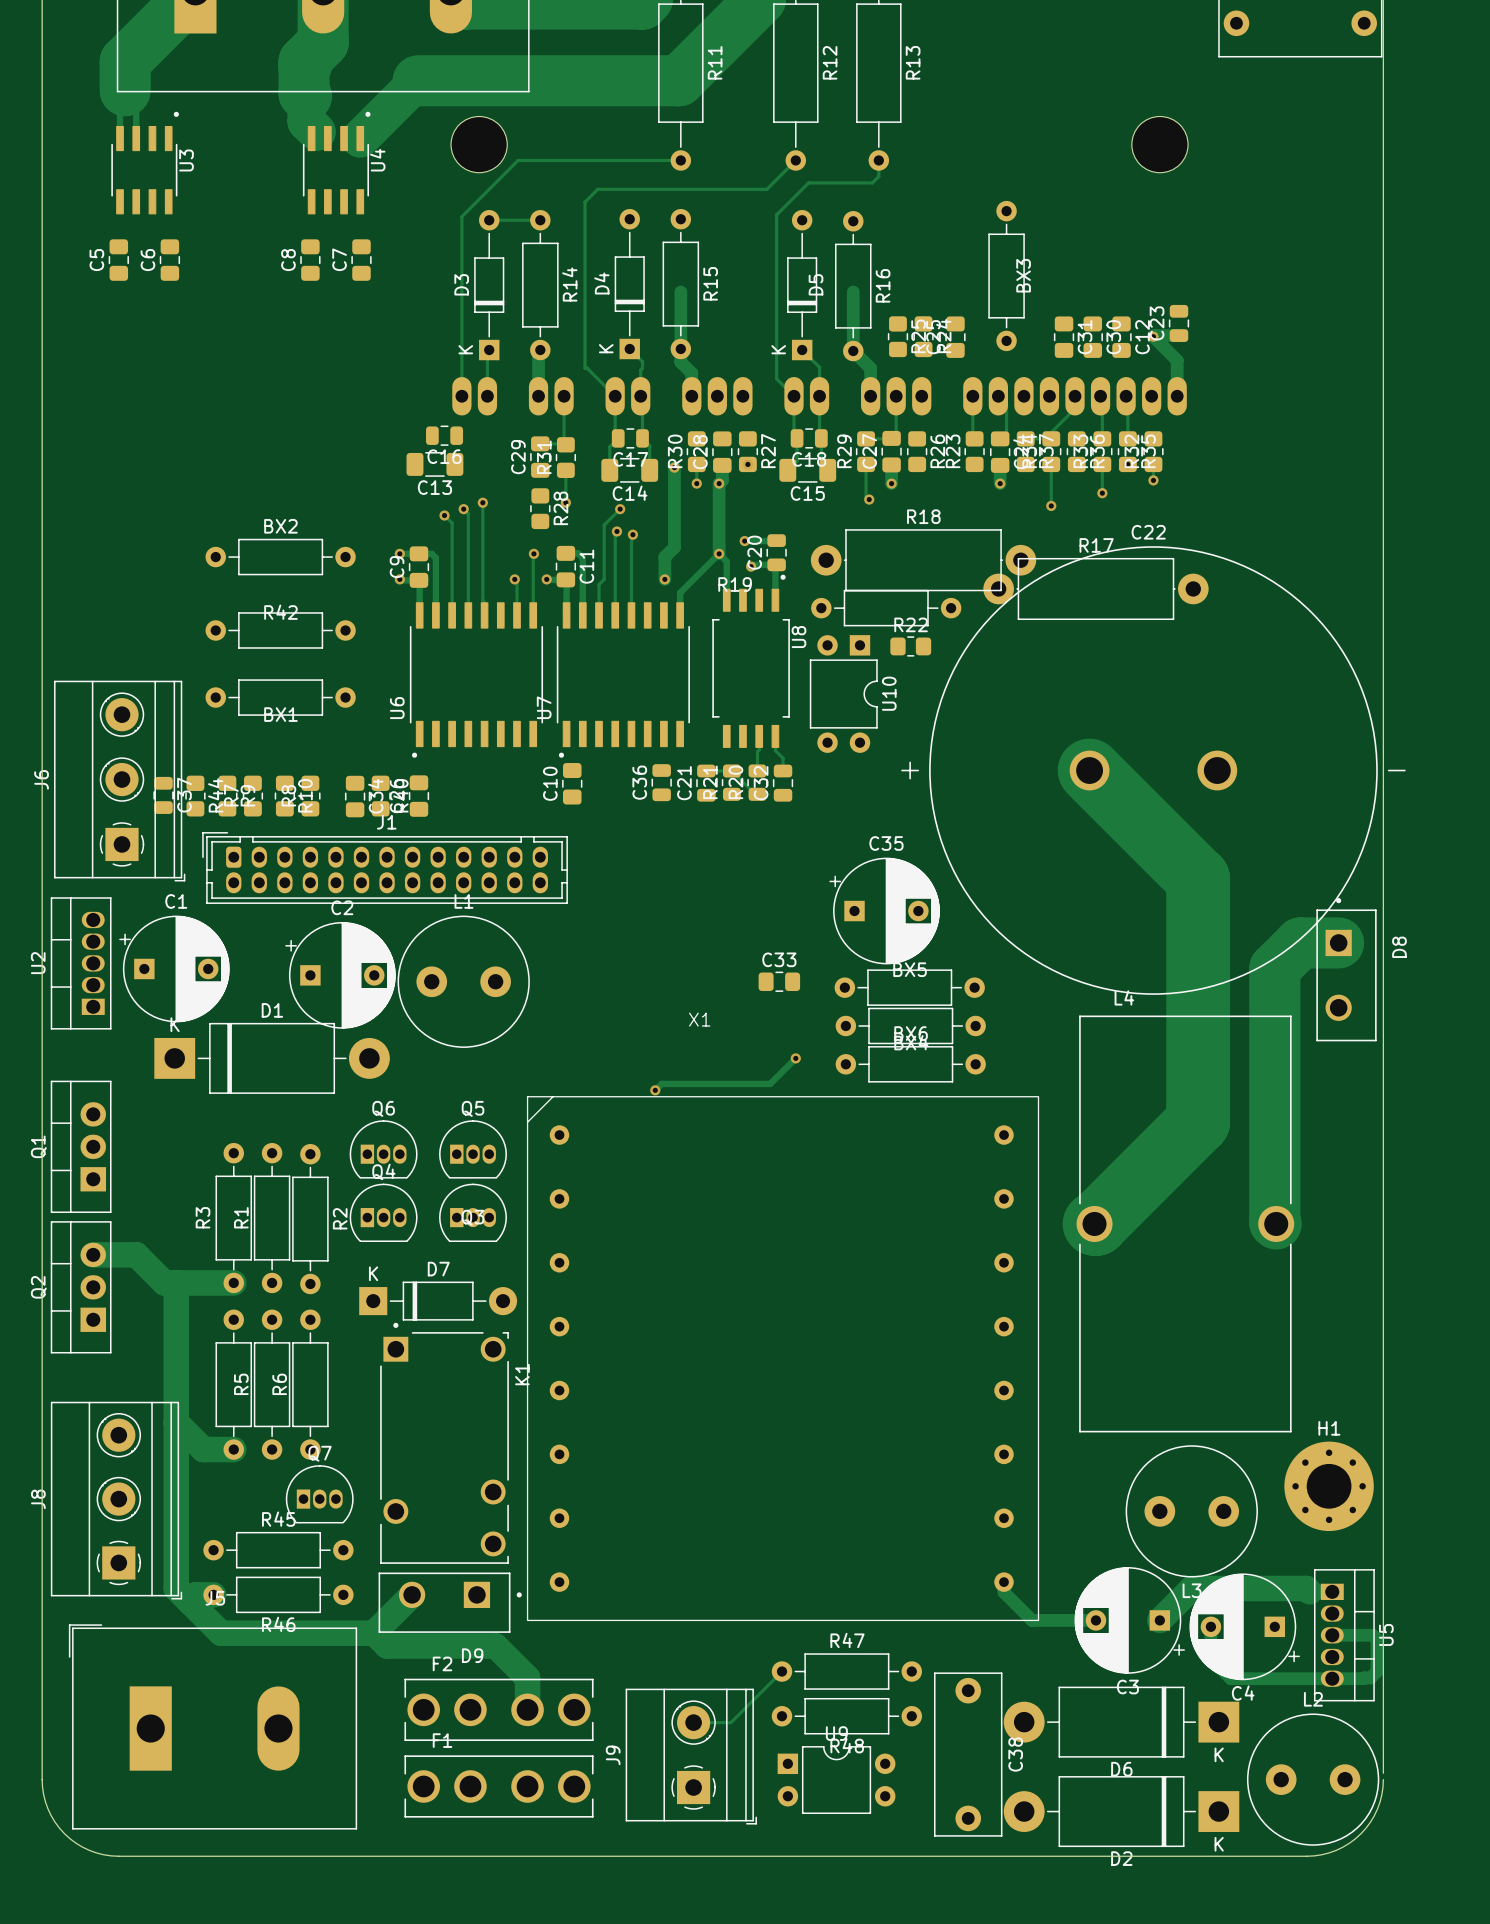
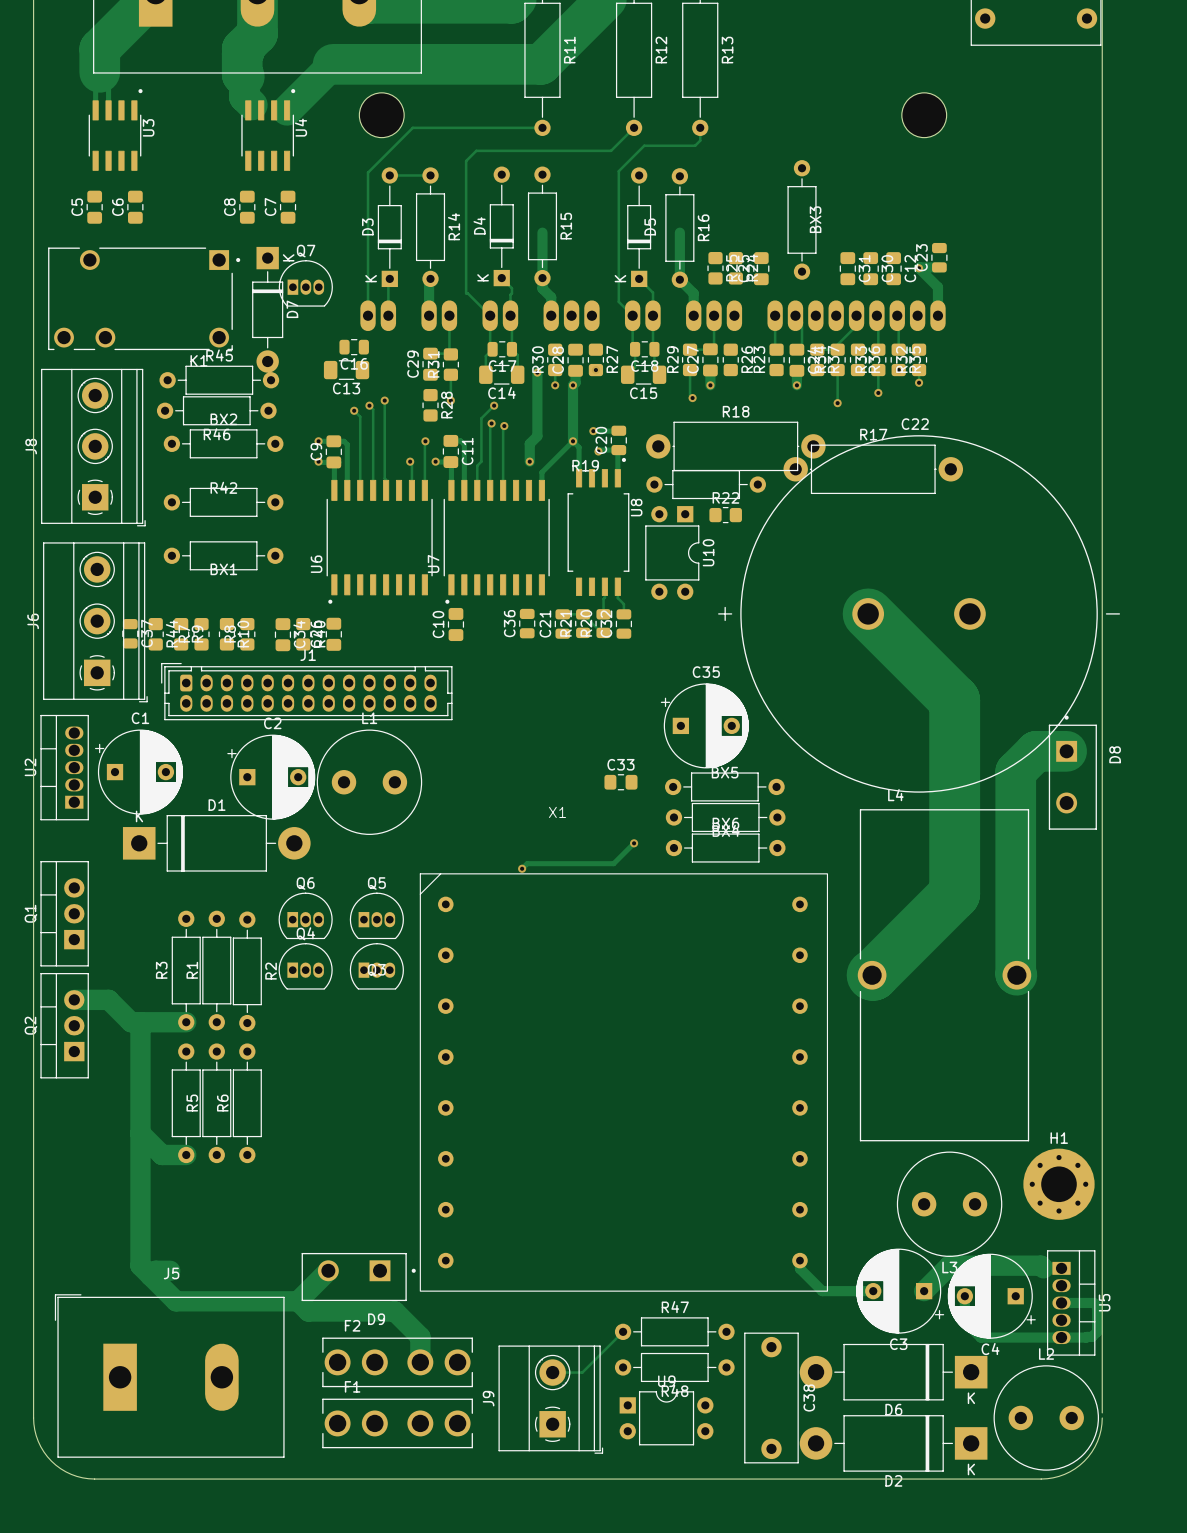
D7 rotation: 0° (438, 1301) -> 90° clockwise (267, 309)
D7 position: (438, 1301) -> (267, 309)
K1 rotation: 0° (444, 1443) -> 90° clockwise (144, 298)
K1 position: (444, 1443) -> (144, 298)
Q7 position: (319, 1494) -> (305, 283)
J8 position: (116, 1500) -> (93, 447)
R45 position: (278, 1550) -> (219, 380)
R46 position: (278, 1594) -> (216, 410)

